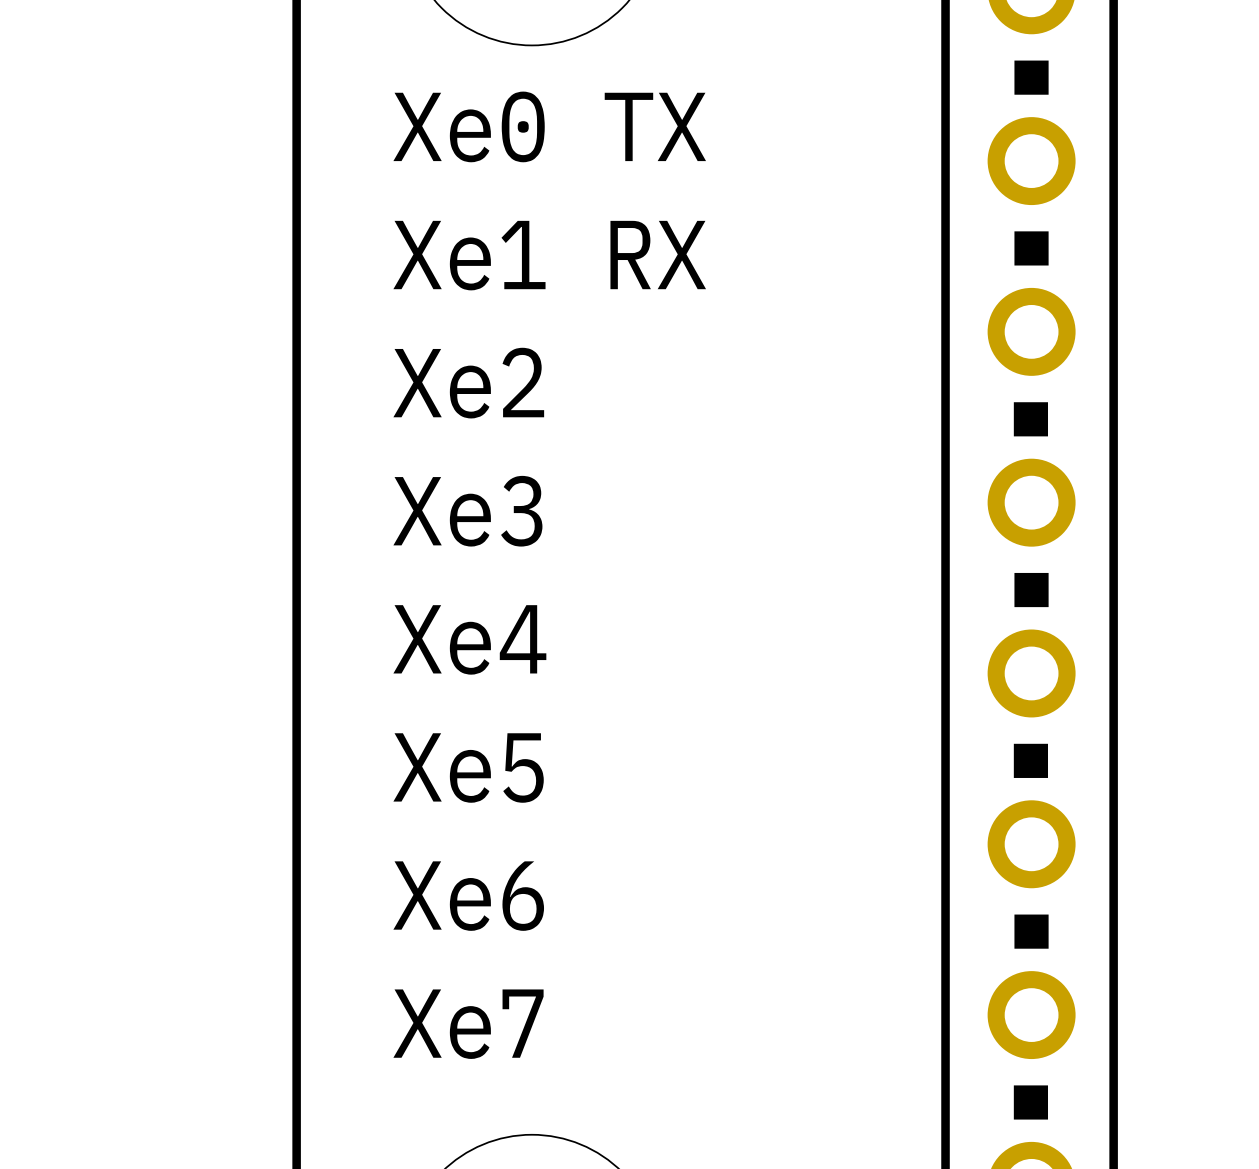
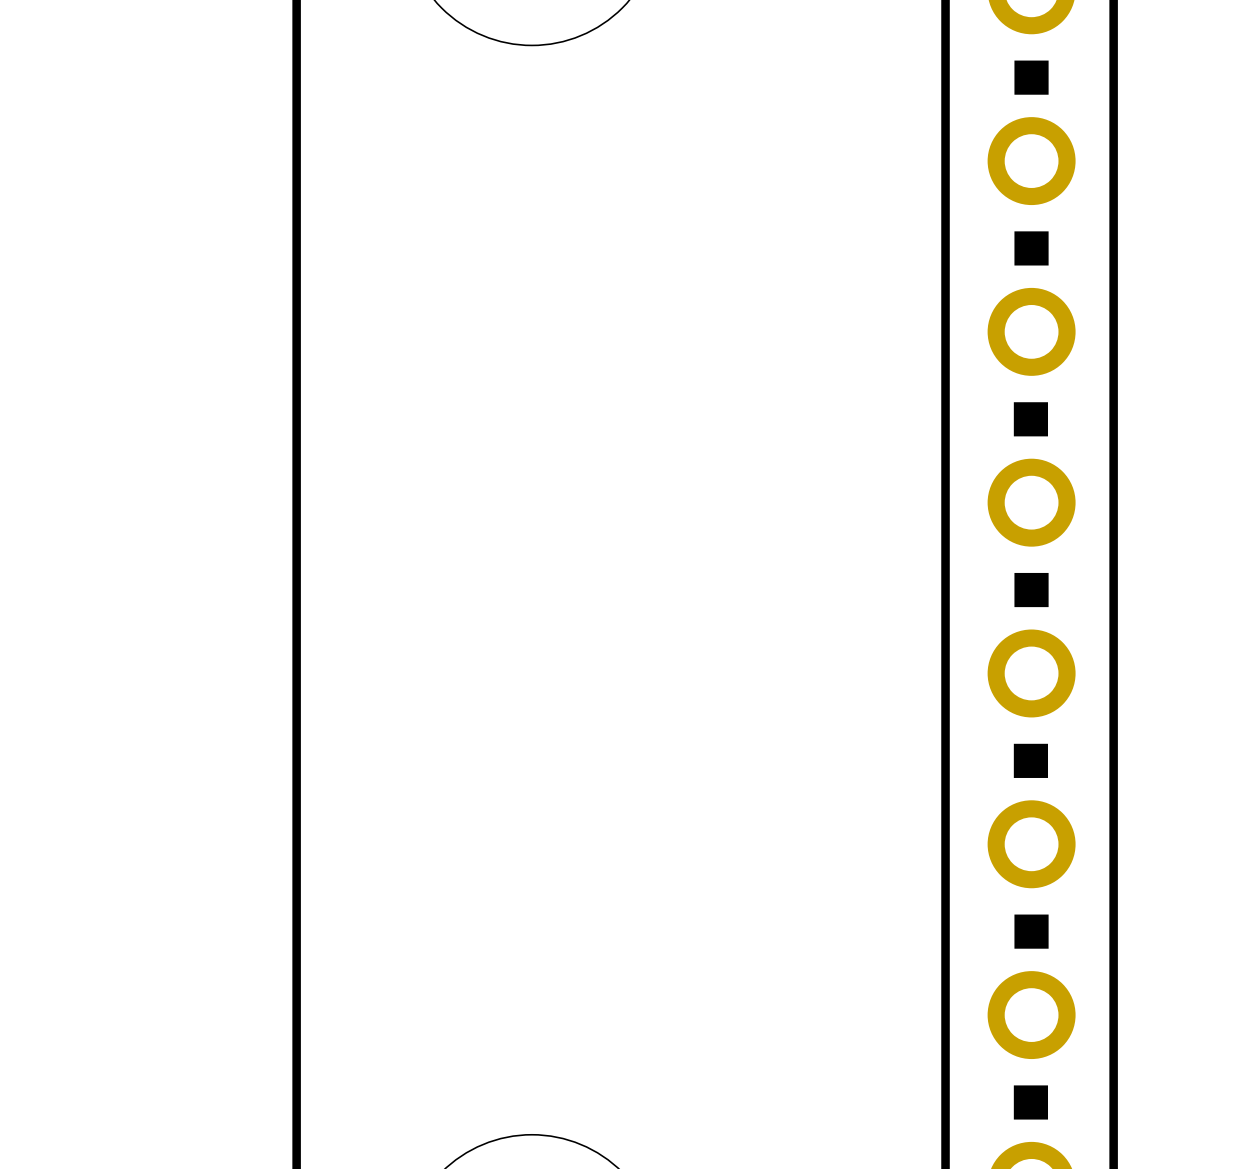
text: Xe0 TX (549, 126) -> none
text: Xe1 RX (549, 255) -> none
text: Xe2 (468, 383) -> none
text: Xe3 (467, 511) -> none
text: Xe4 (469, 639) -> none
text: Xe5 (468, 768) -> none
text: Xe6 (468, 896) -> none
text: Xe7 (468, 1024) -> none

